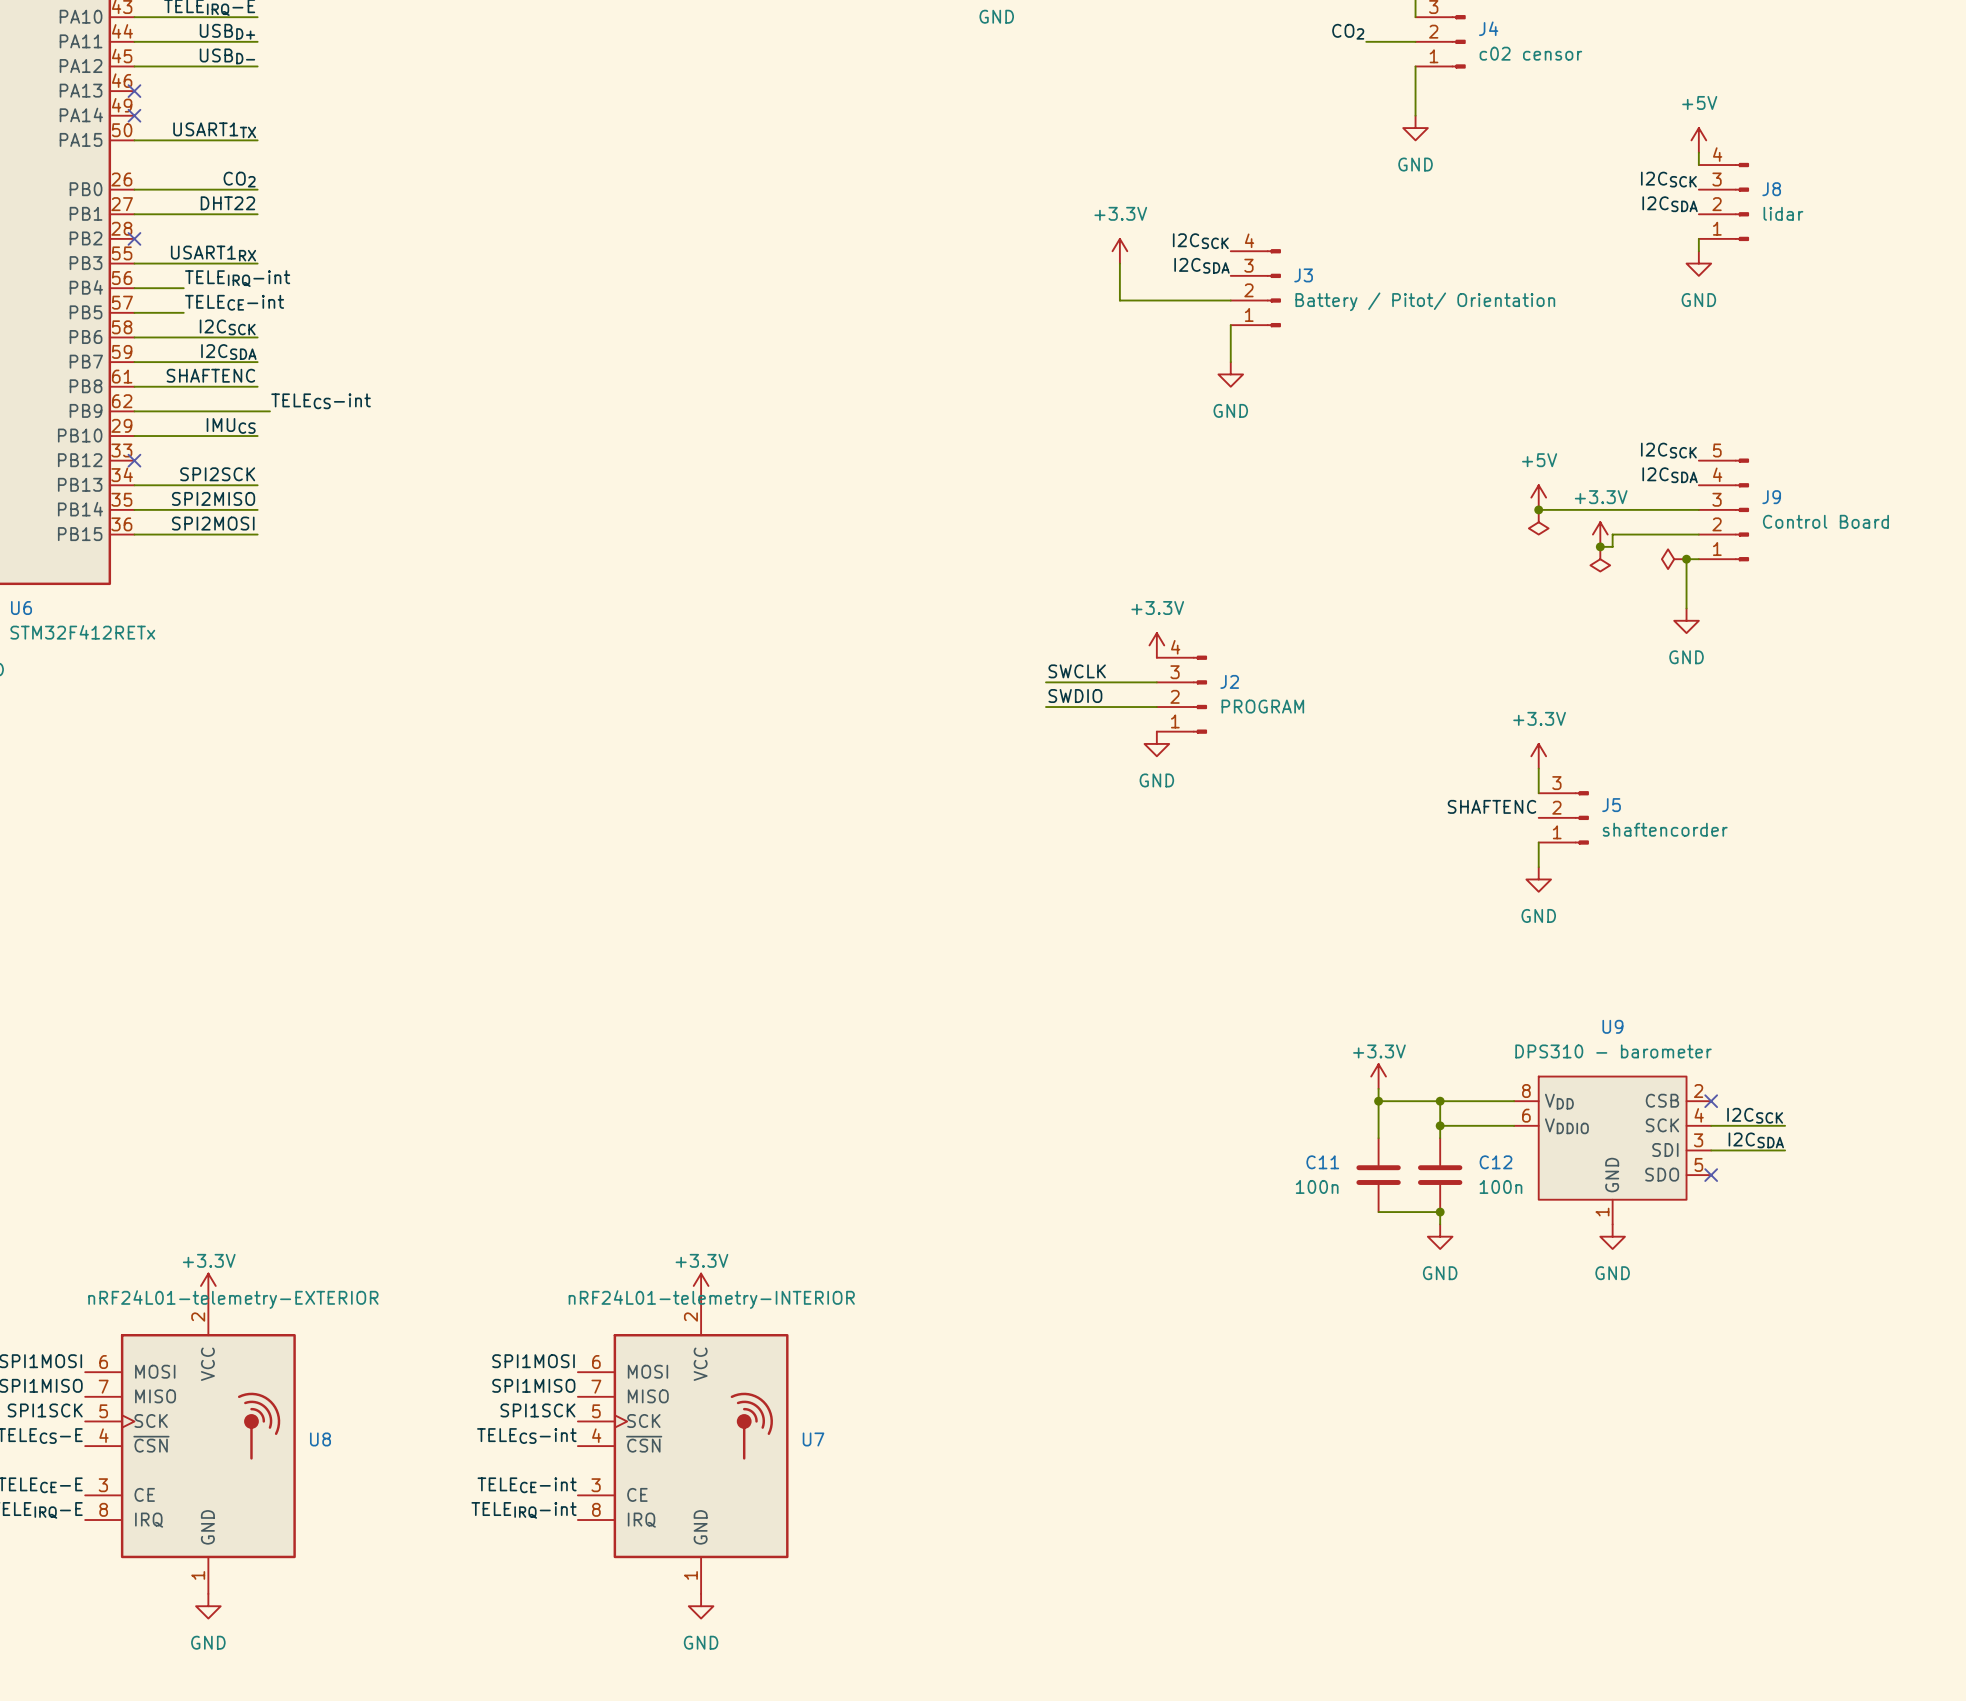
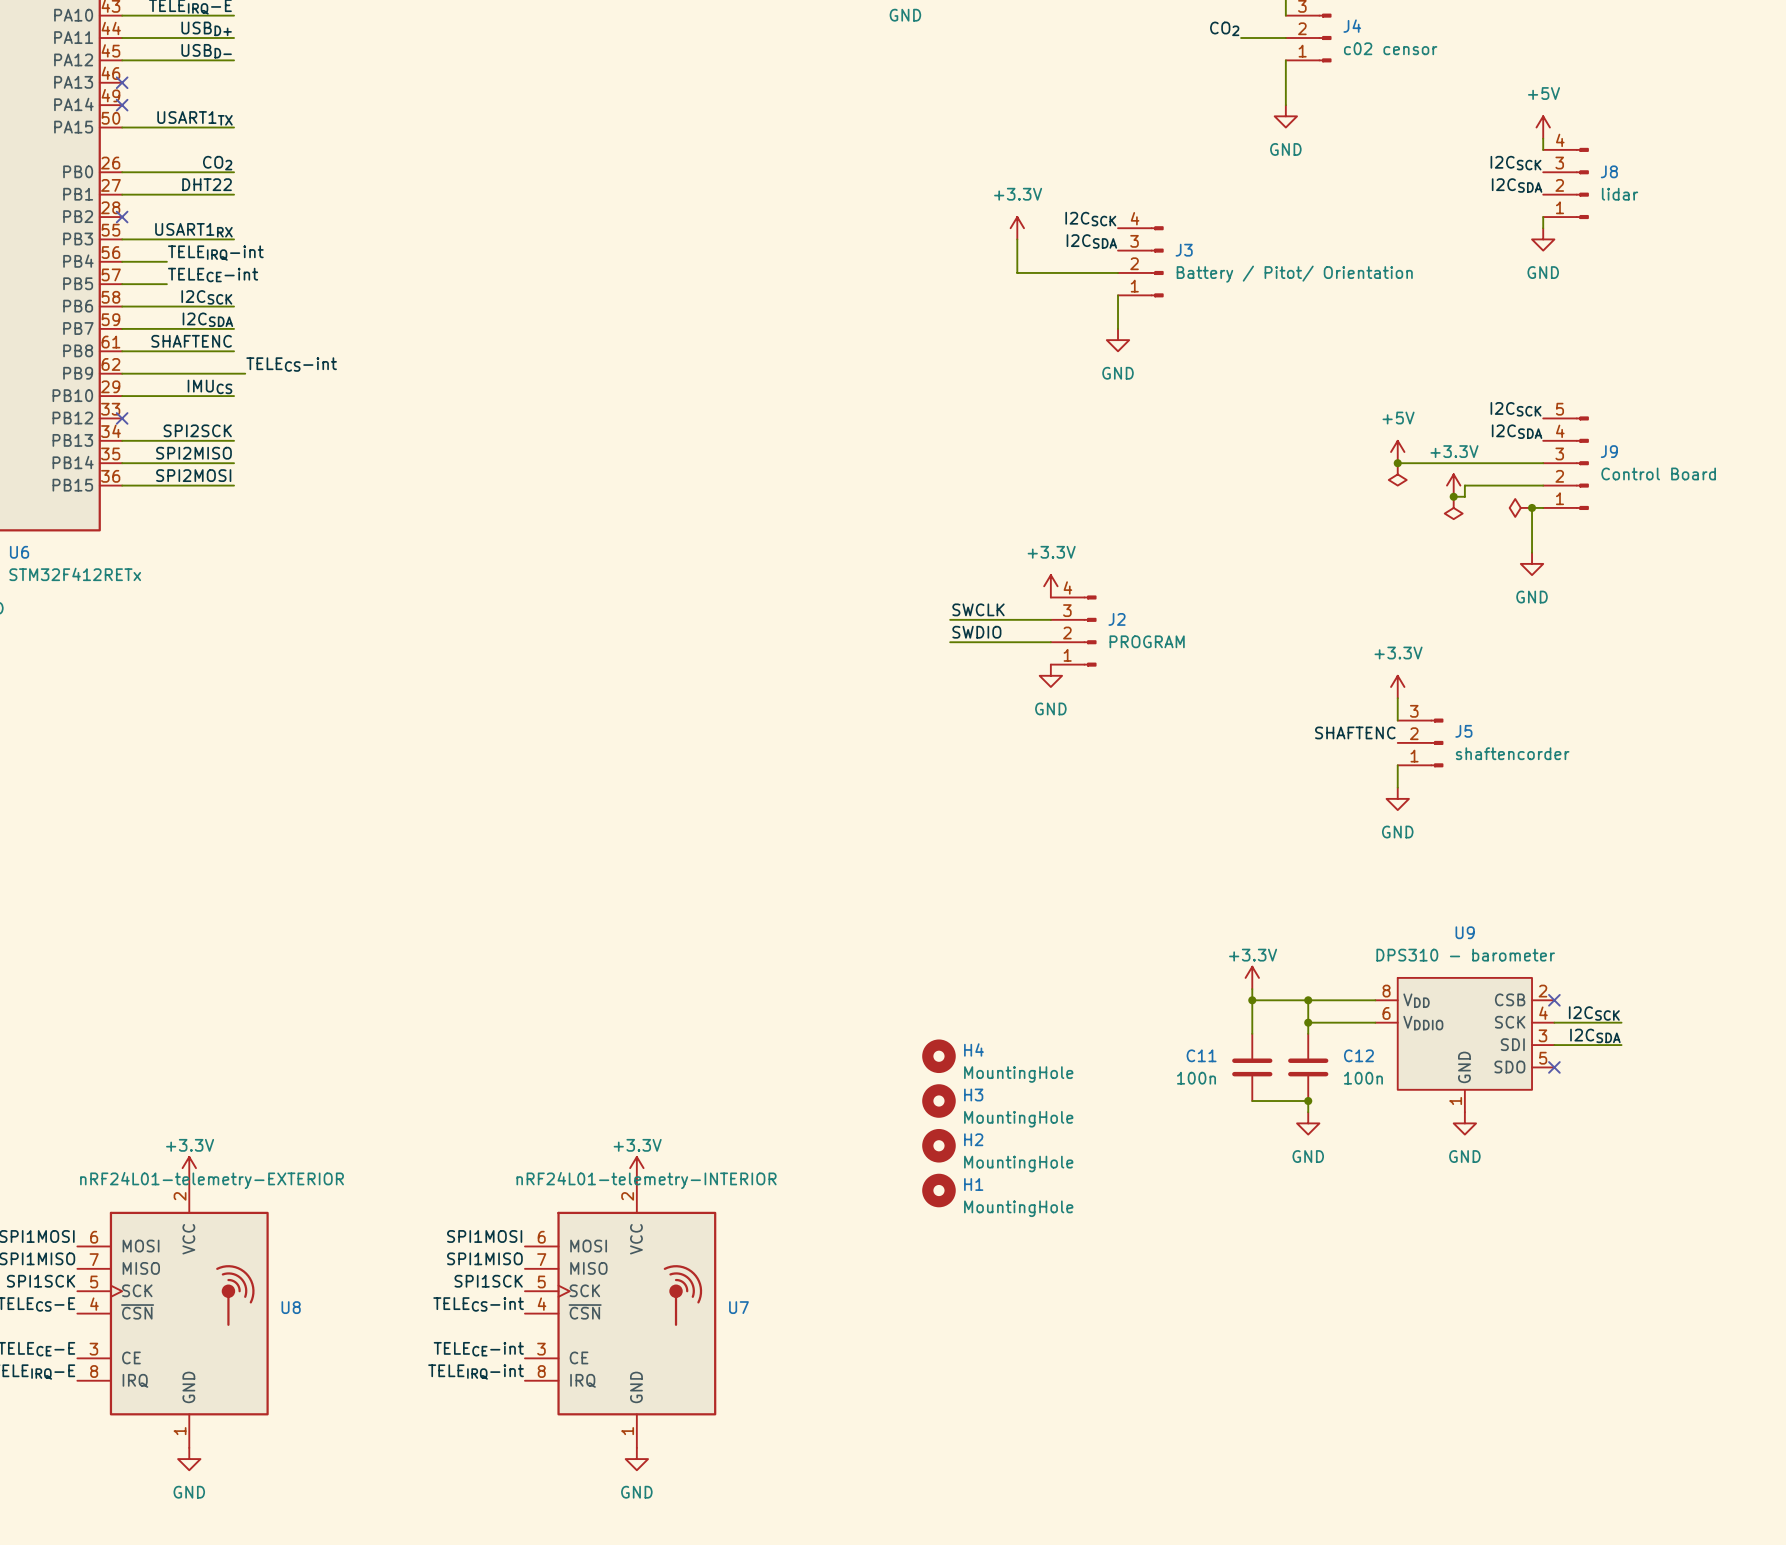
H4: none -> MountingHole (938, 1056)
H3: none -> MountingHole (938, 1101)
H2: none -> MountingHole (938, 1145)
H1: none -> MountingHole (938, 1190)

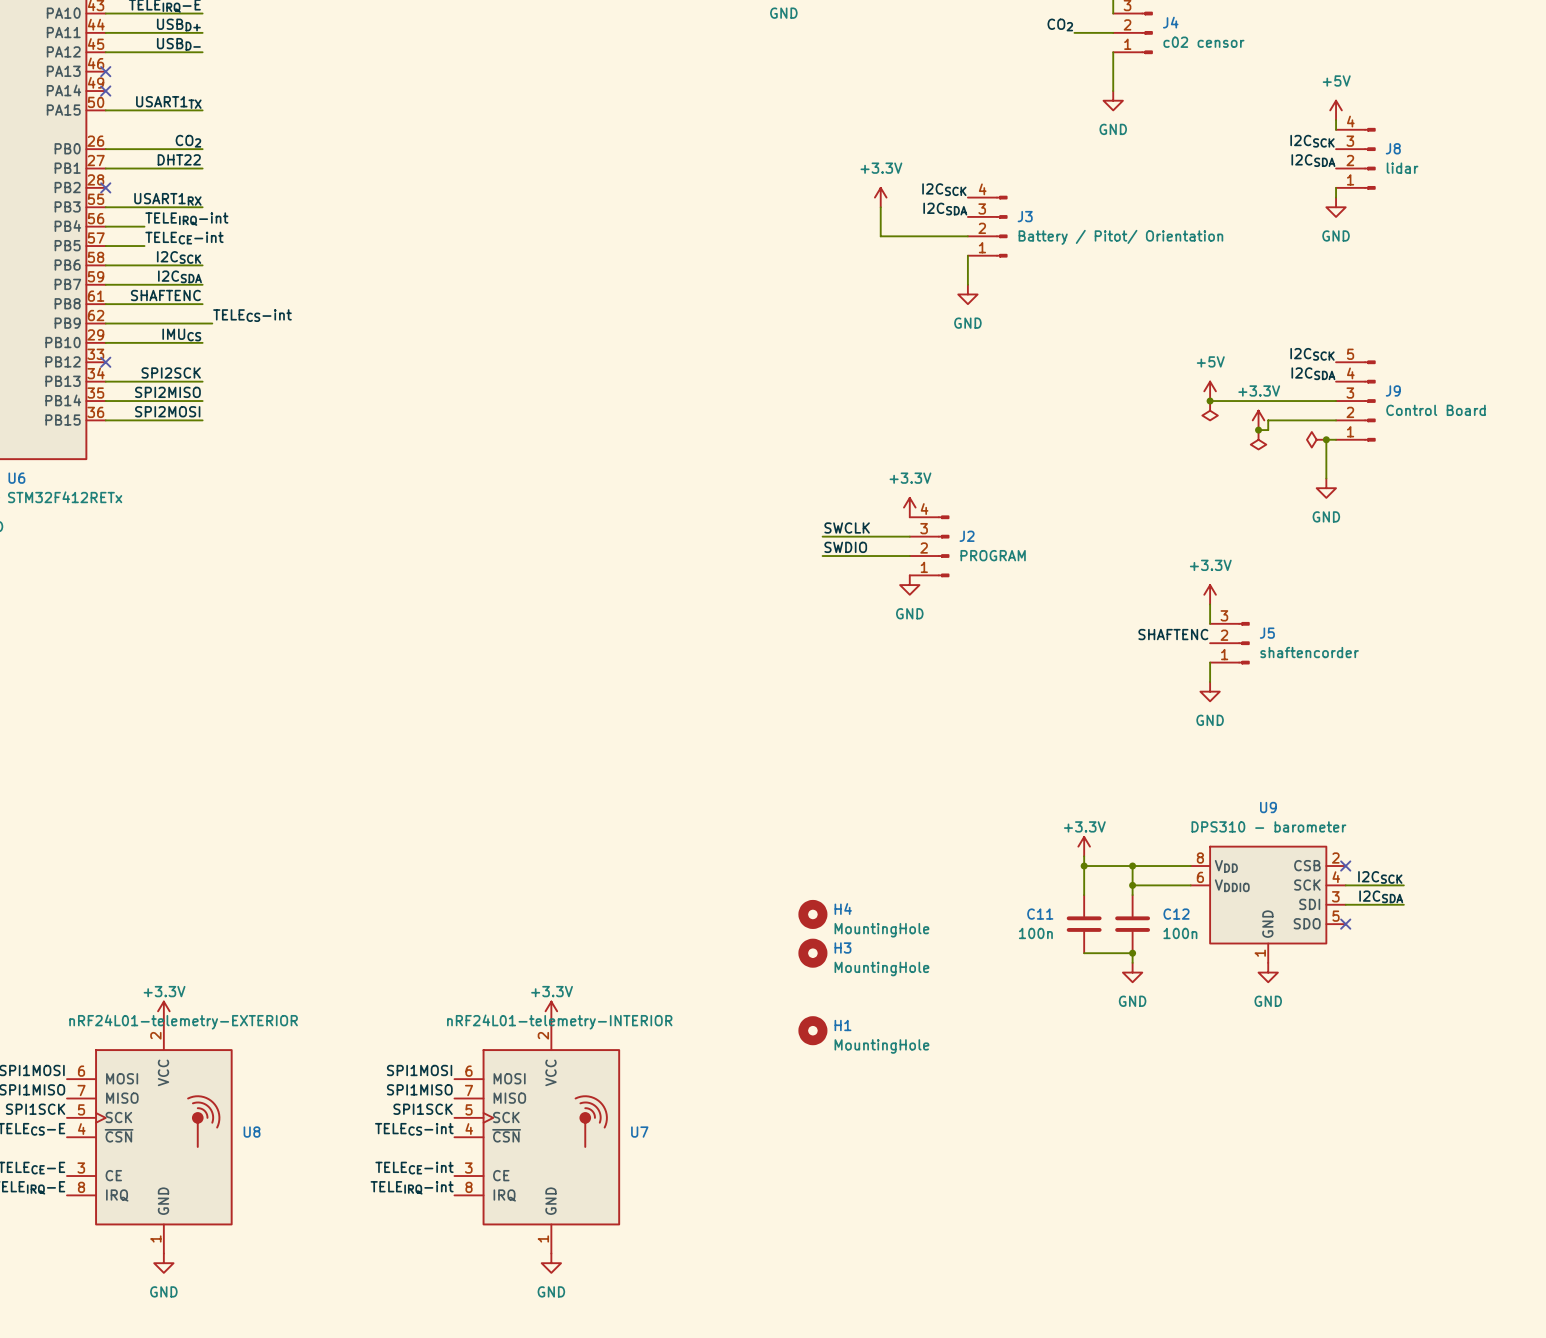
H2: MountingHole (938, 1145) -> none

